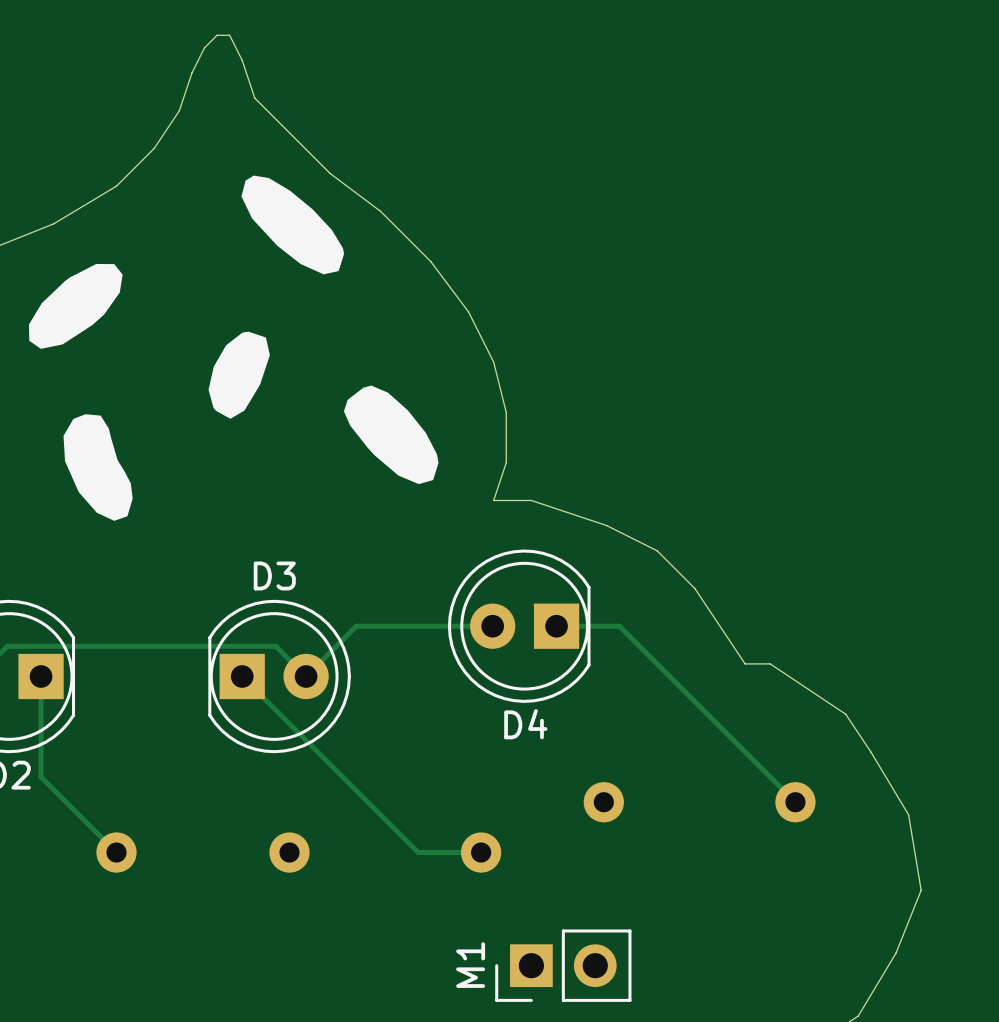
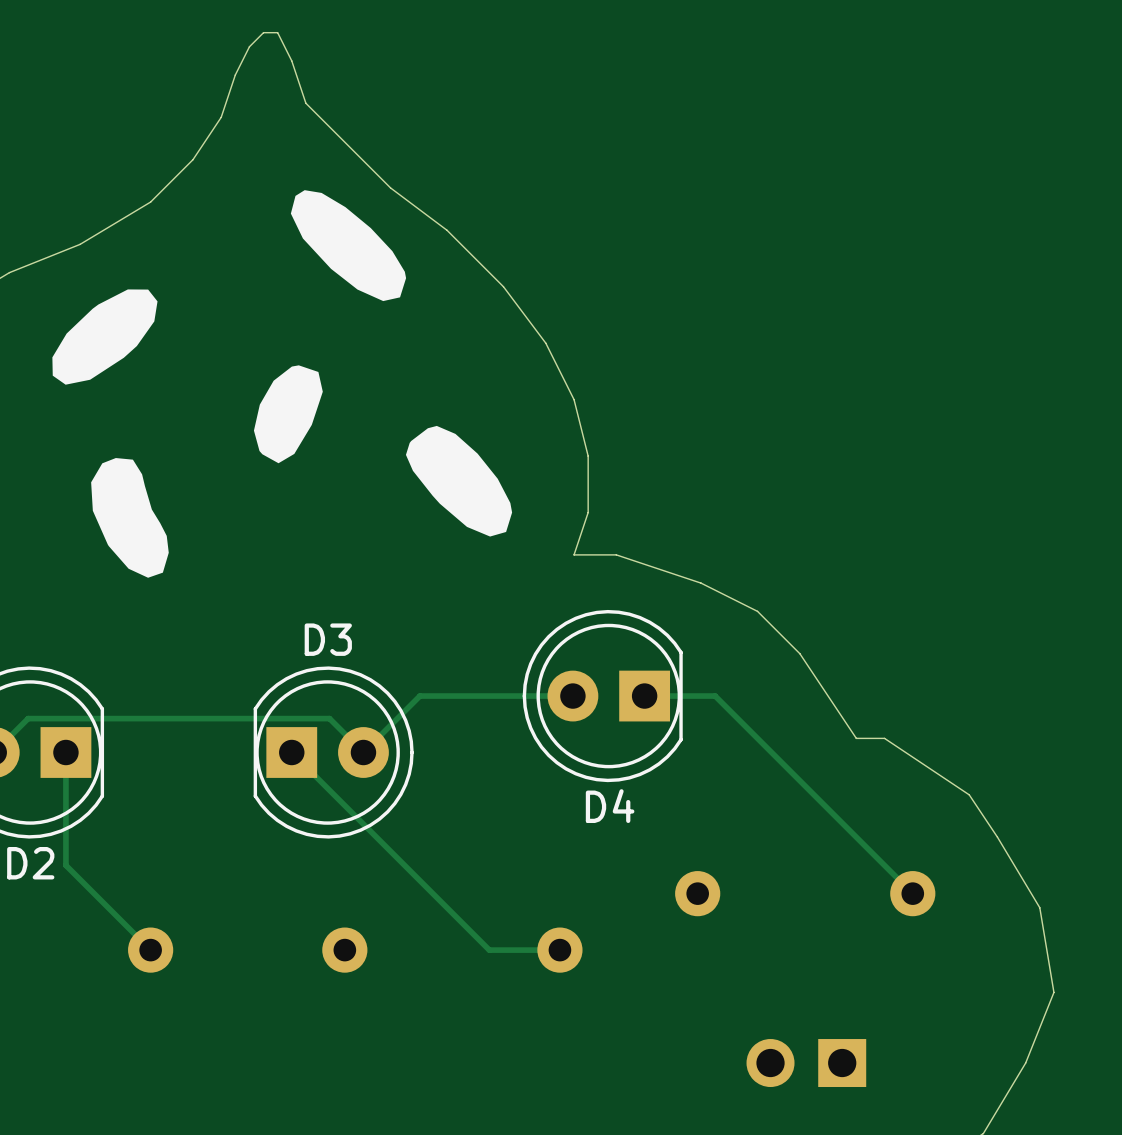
M1 side: top (563, 965) -> bottom (806, 1063)

